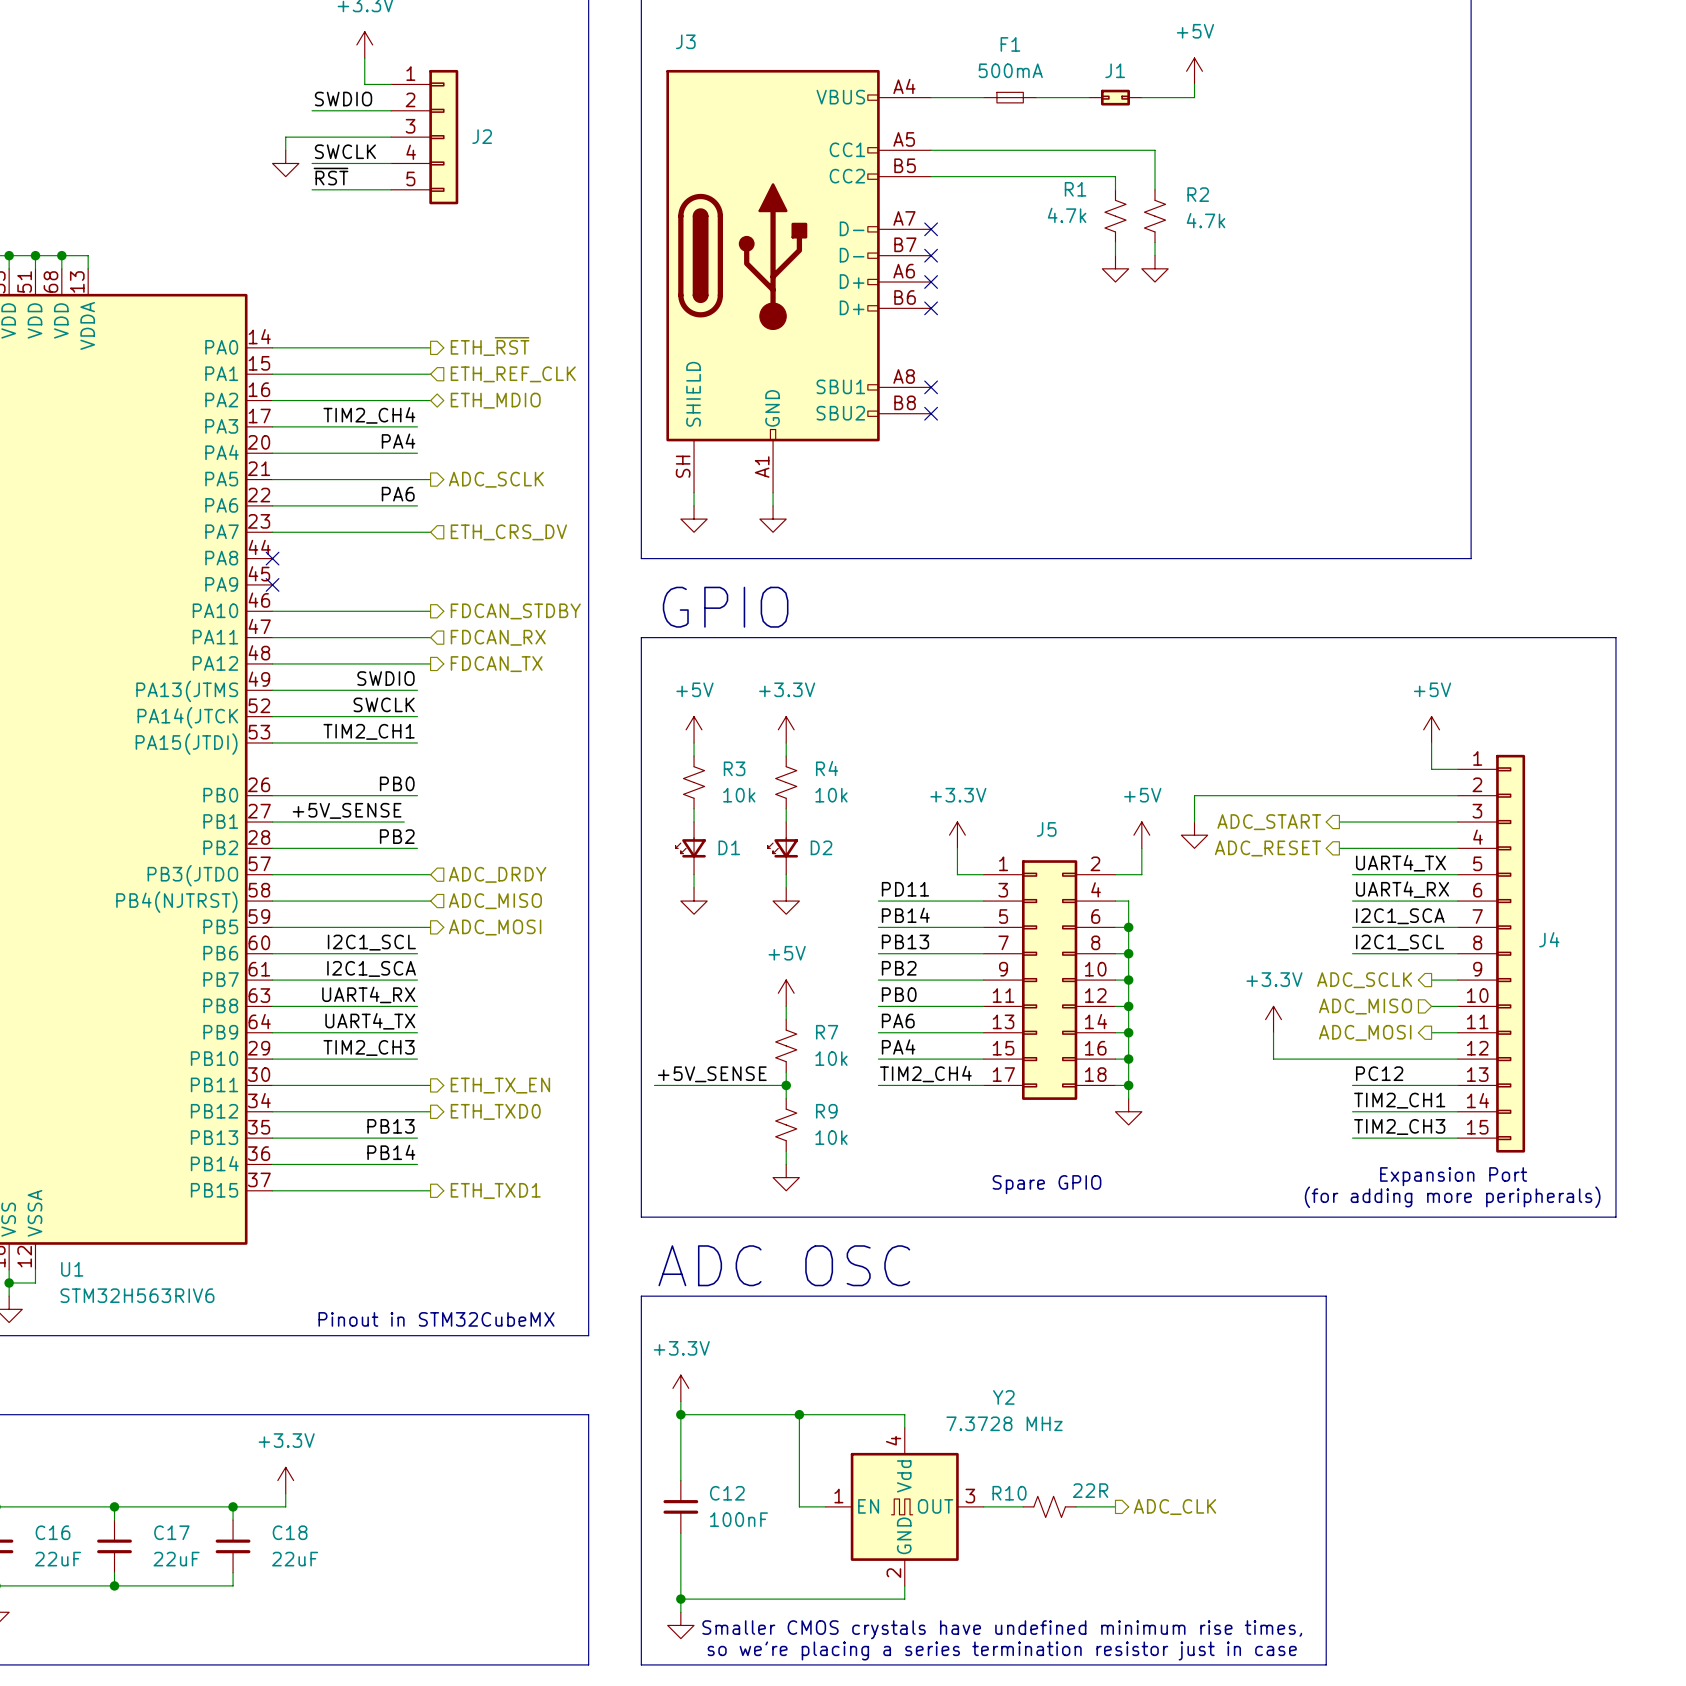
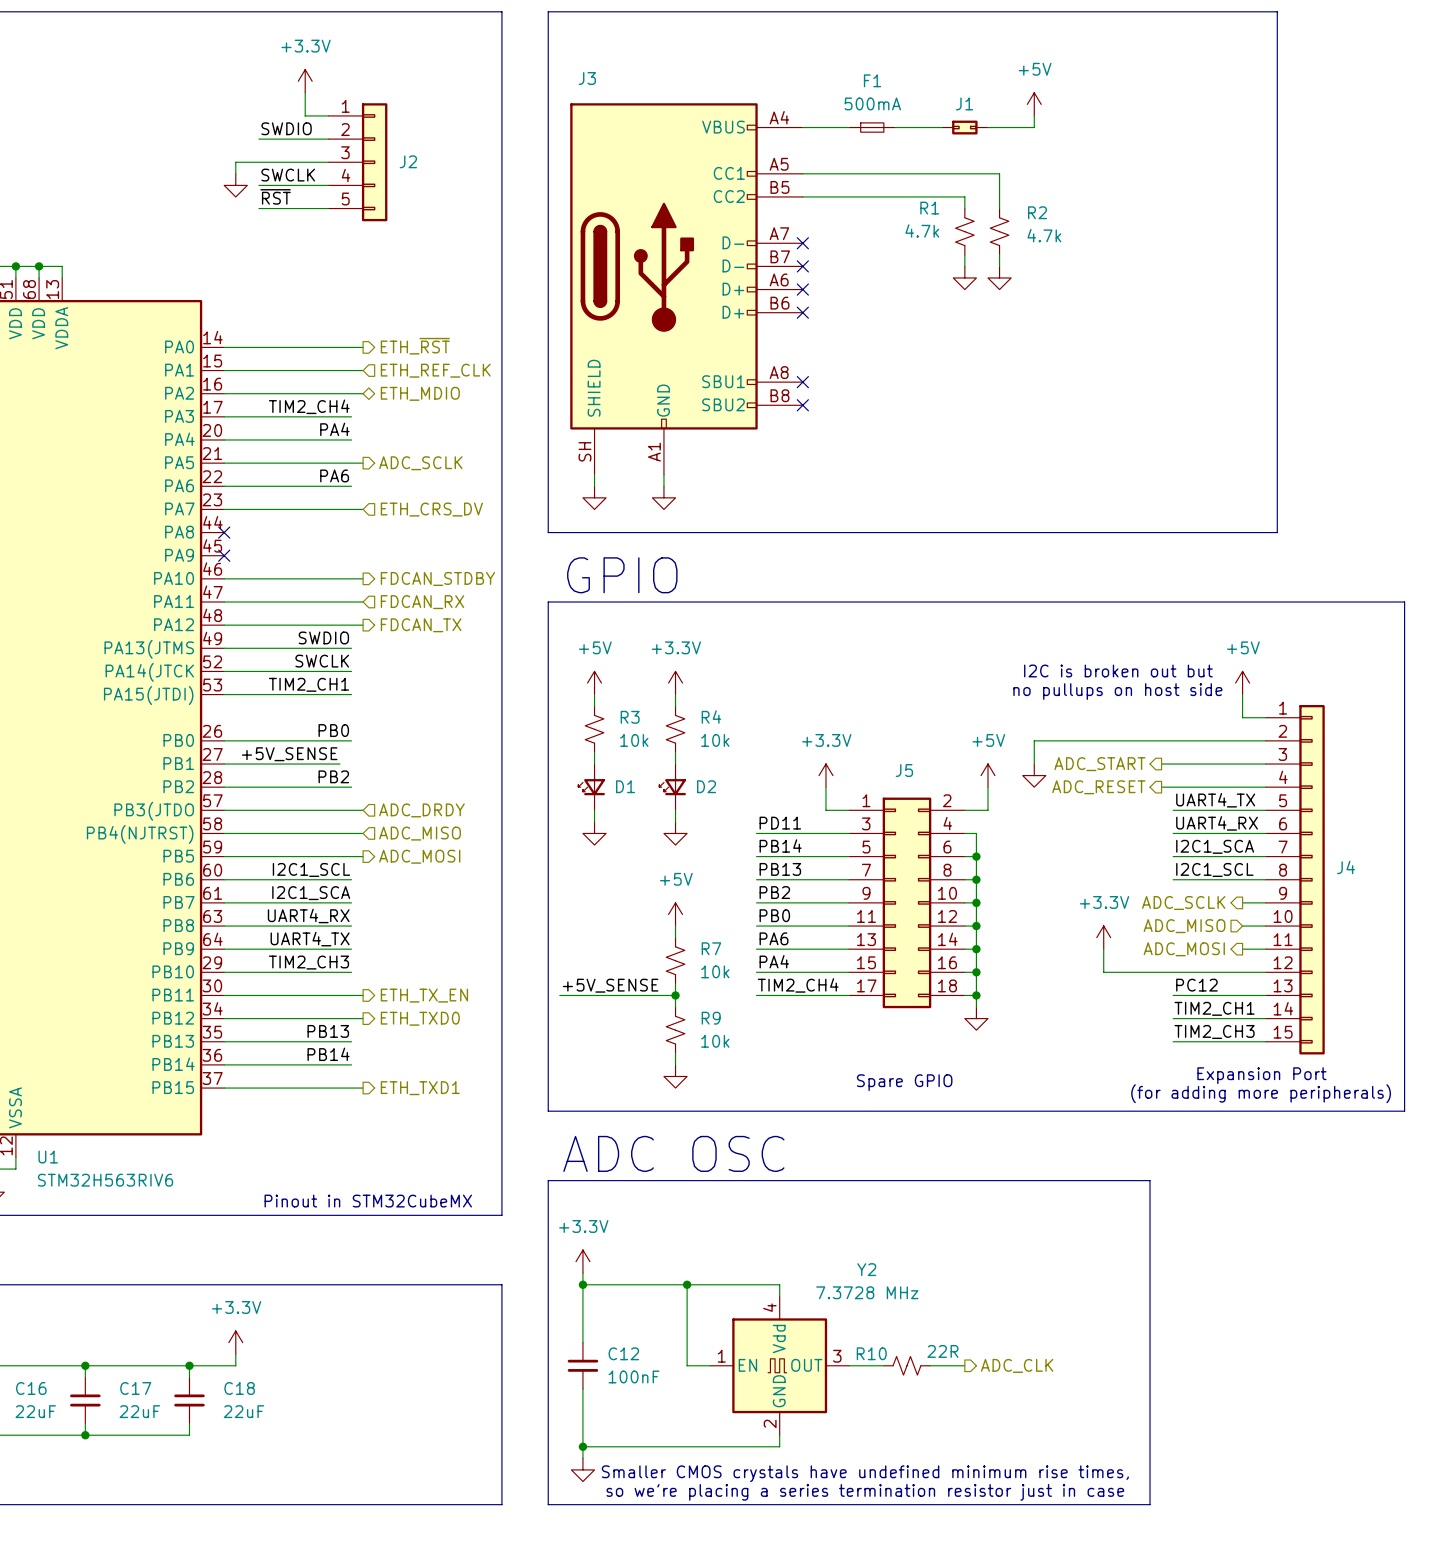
text: none -> I2C is broken out but (1118, 670)
text: none -> no pullups on host side (1117, 691)

